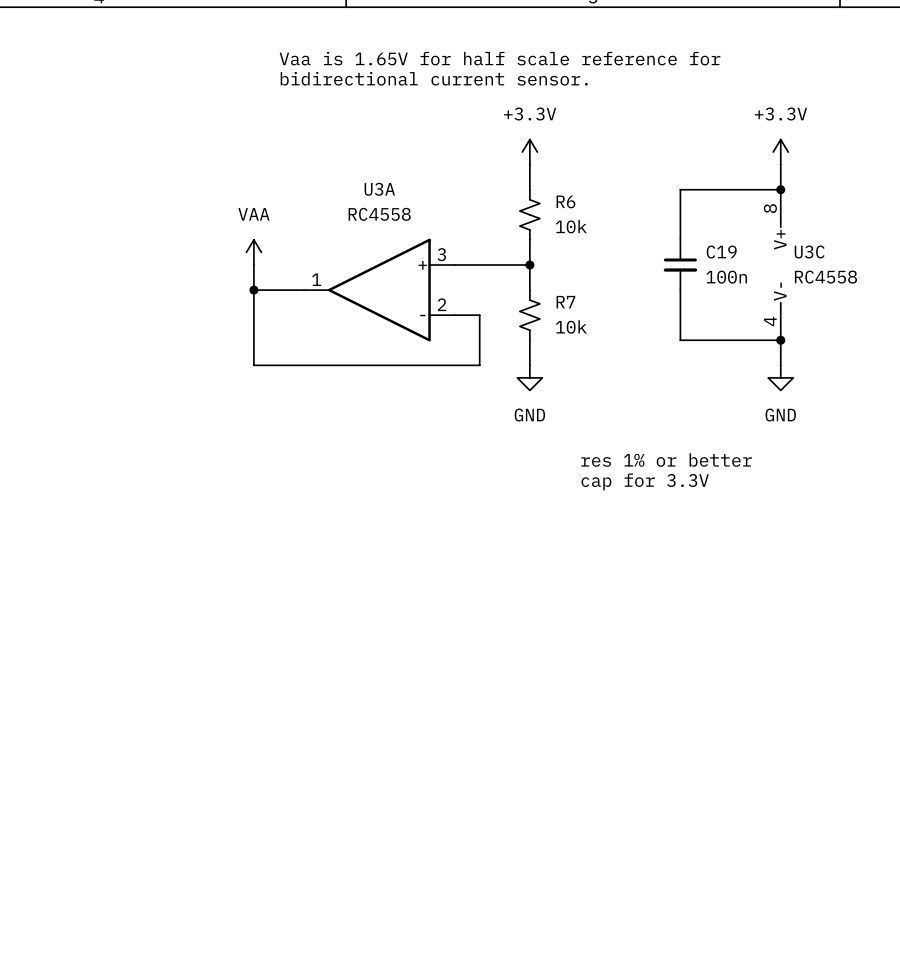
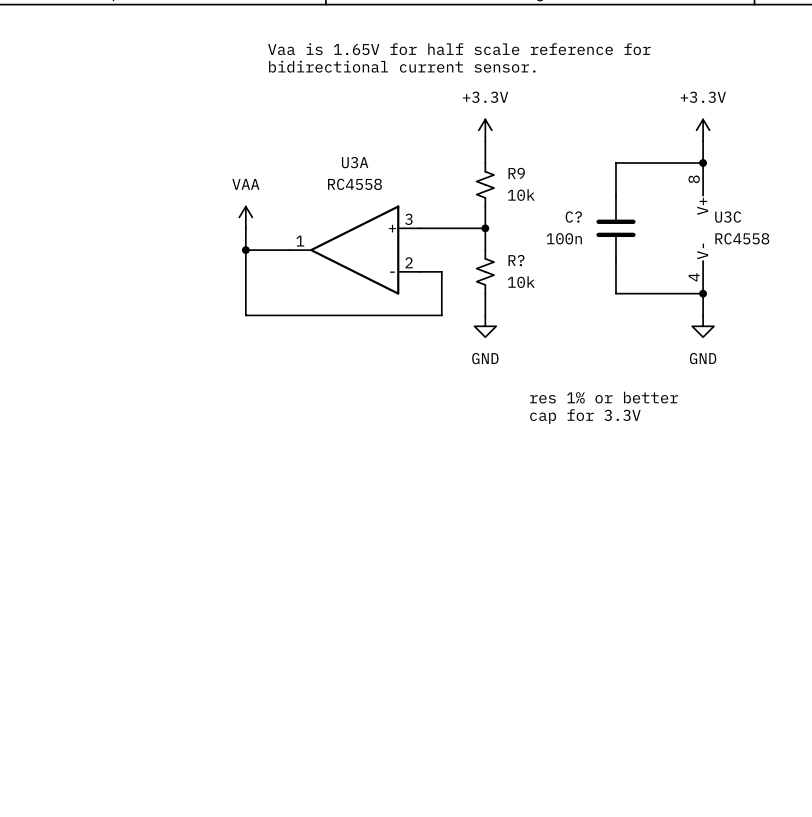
R6 name: R6 (565, 201) -> R9 (516, 173)
C19: 100n (680, 265) -> none
C?: none -> 100n (615, 228)
R7 name: R7 (565, 302) -> R? (516, 260)

